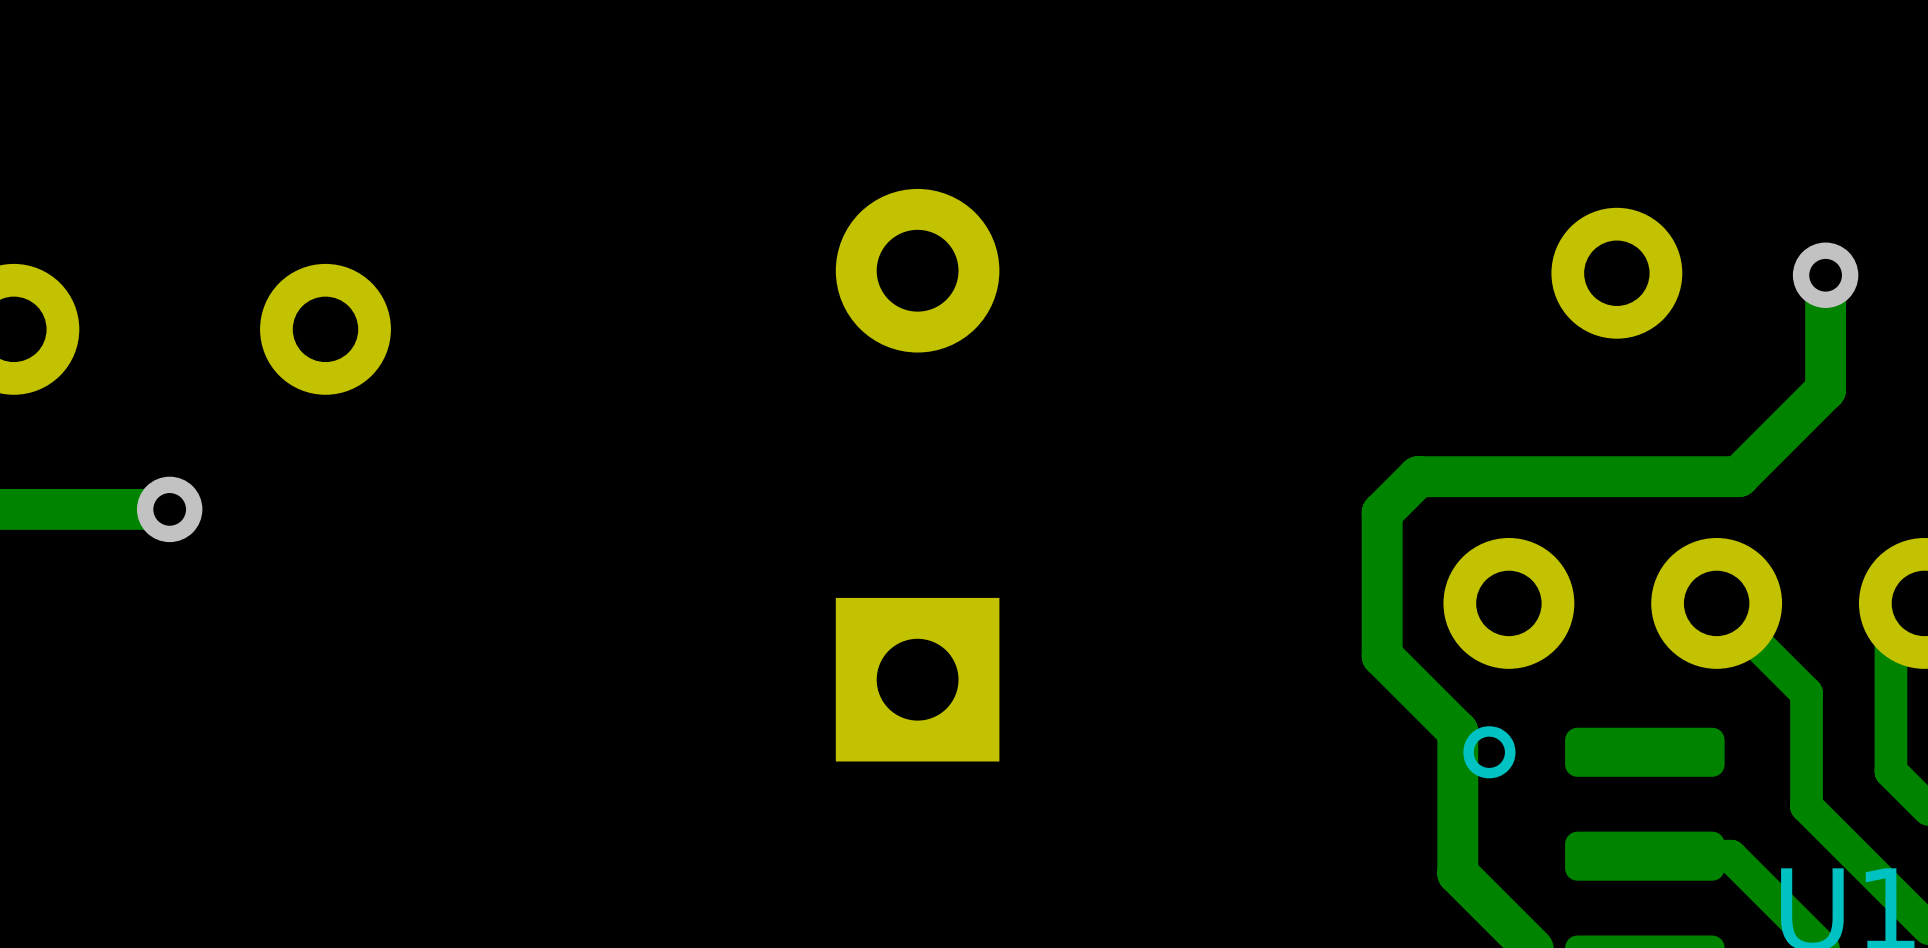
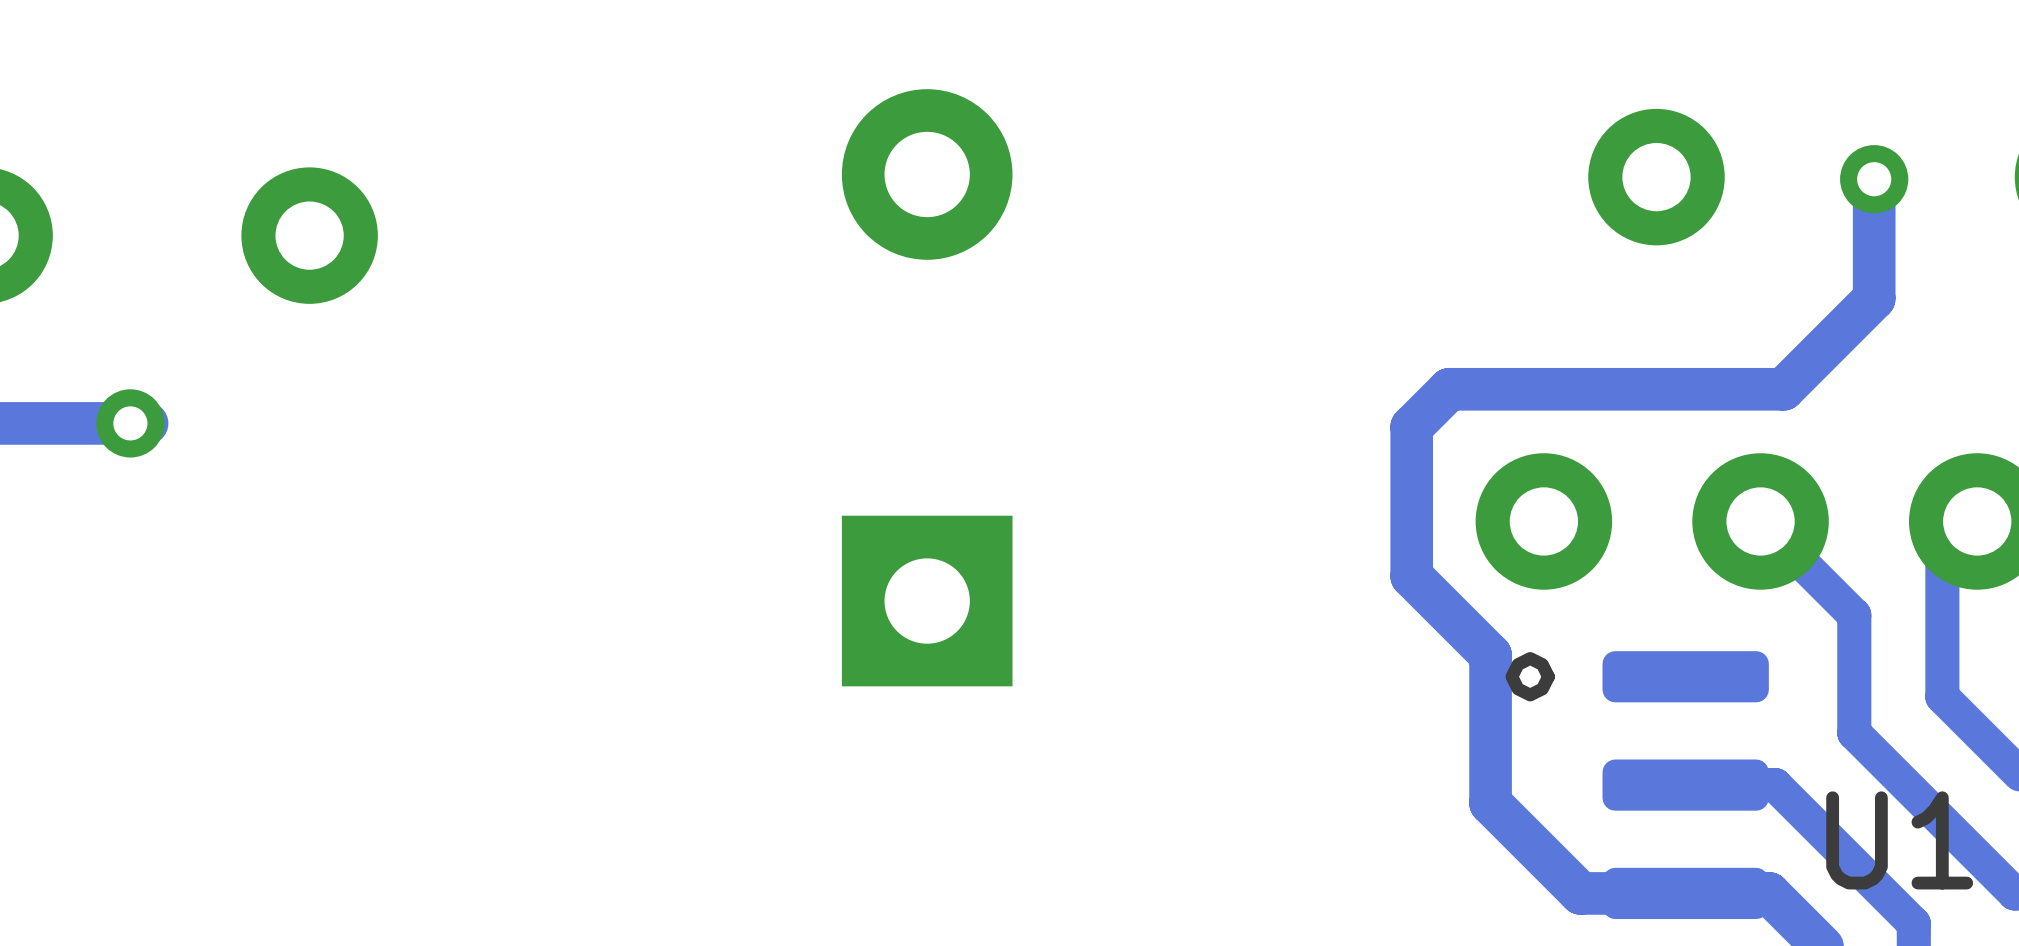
via position: (169, 509) -> (130, 423)

